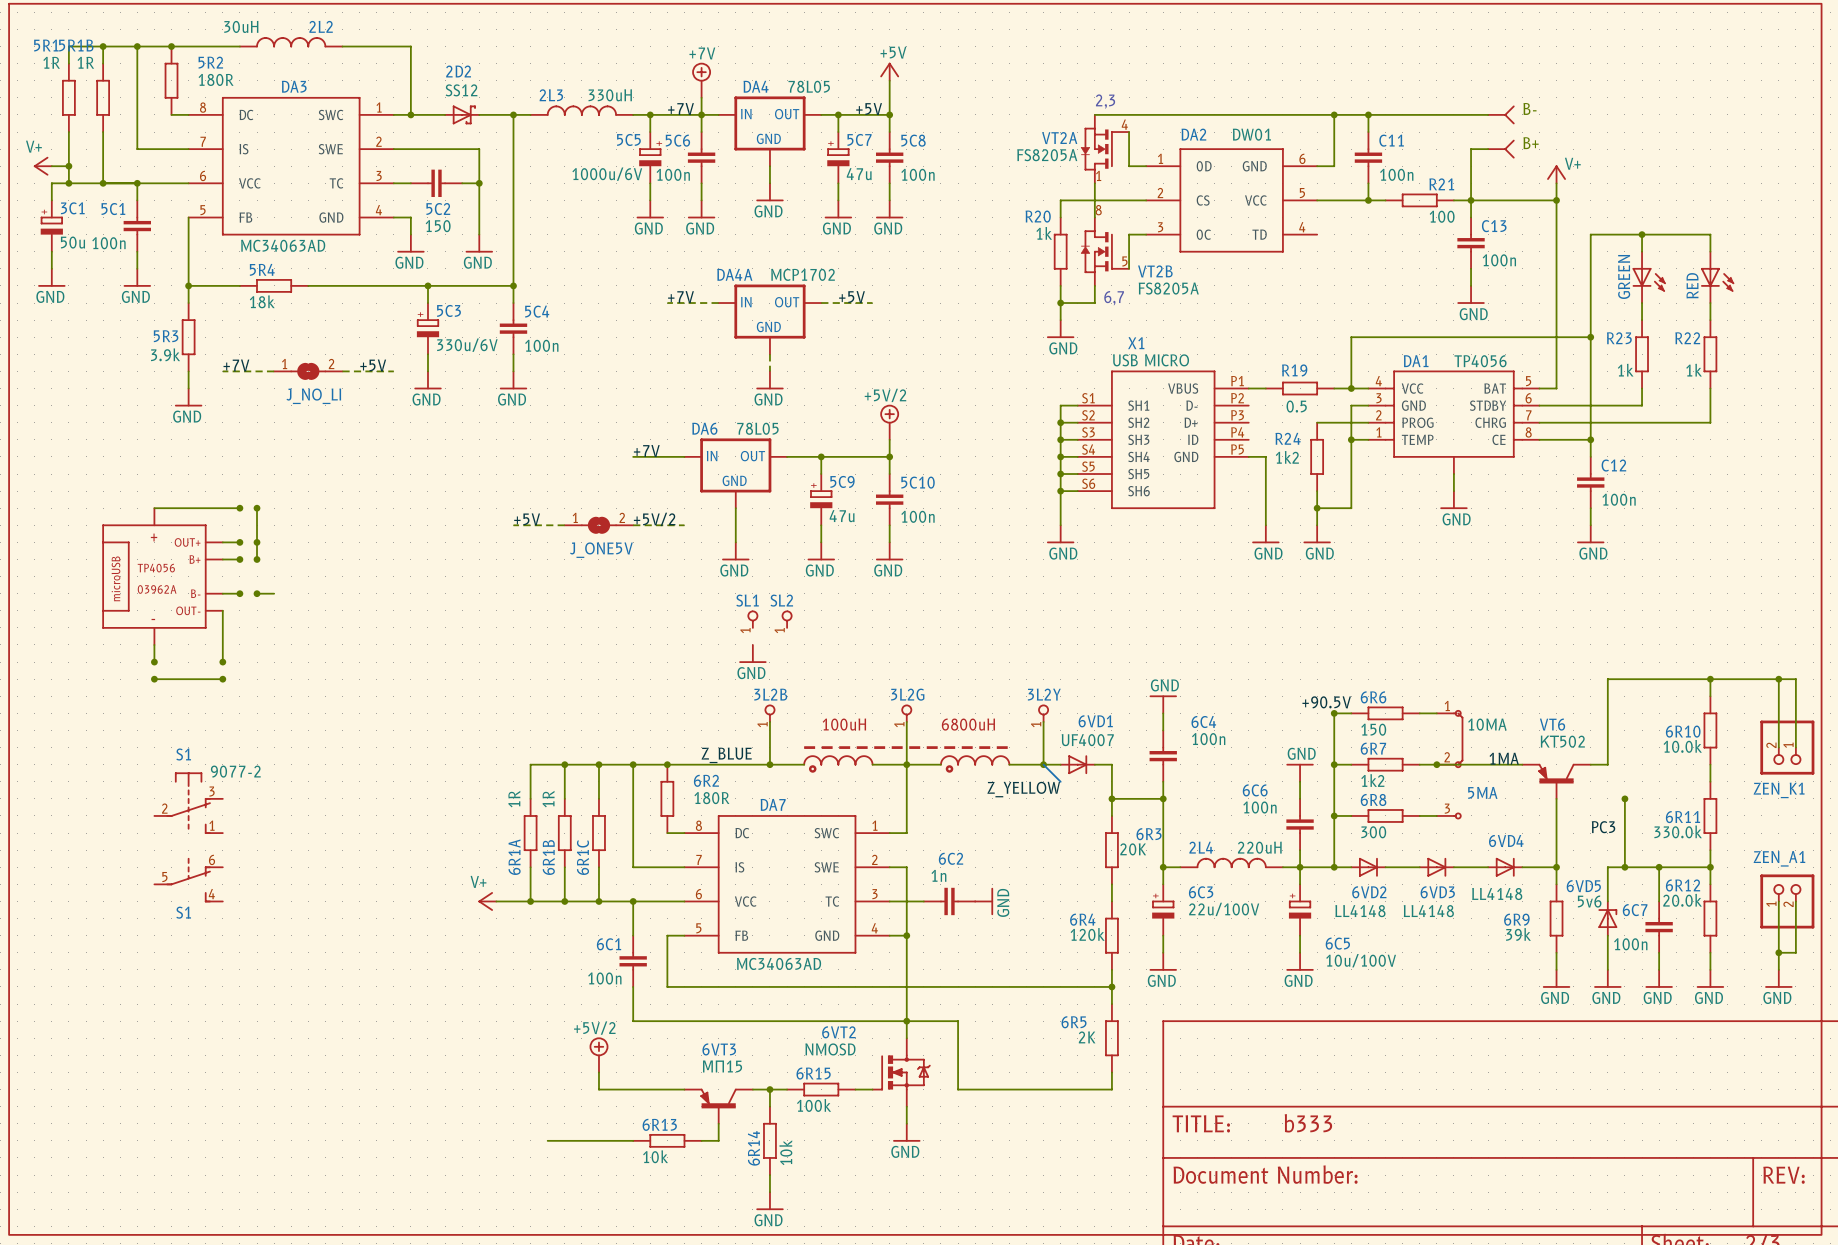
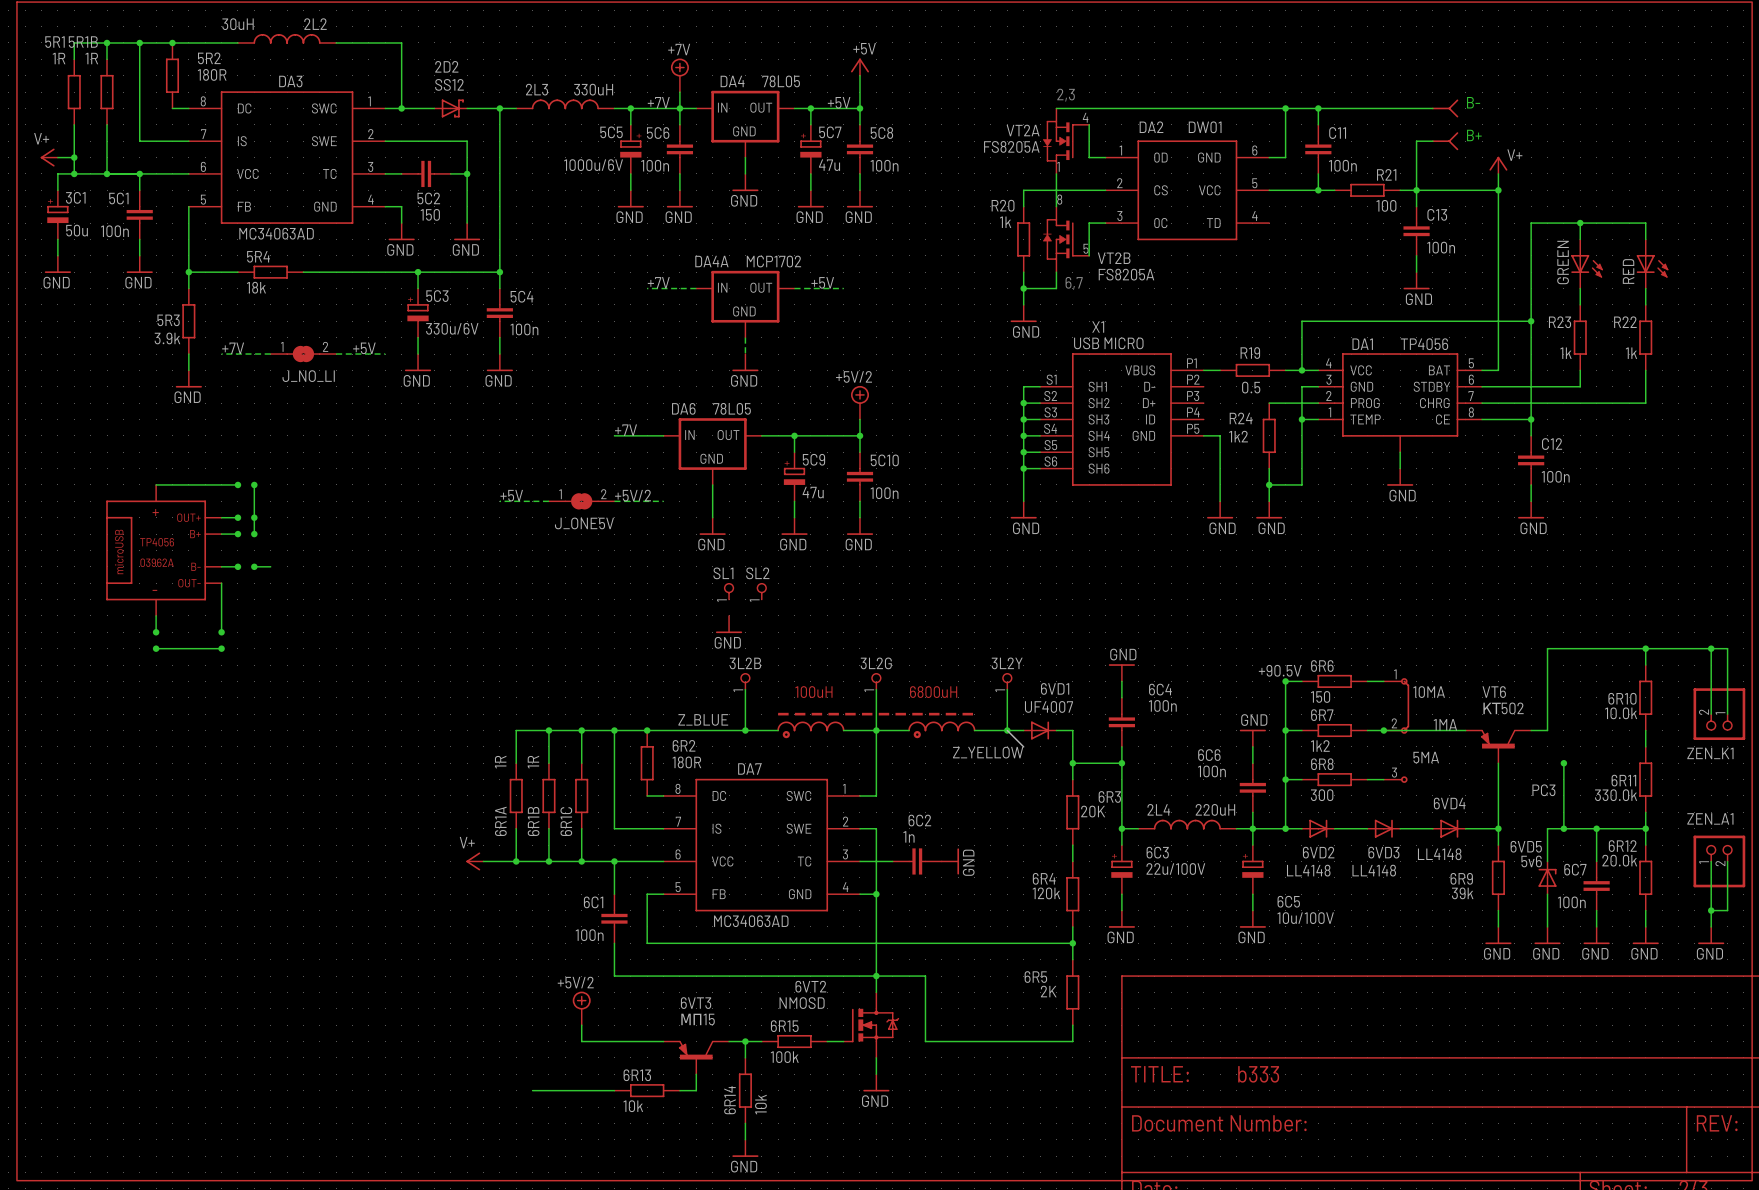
S1: 9077-2 (188, 803) -> none
S1: (188, 880) -> none

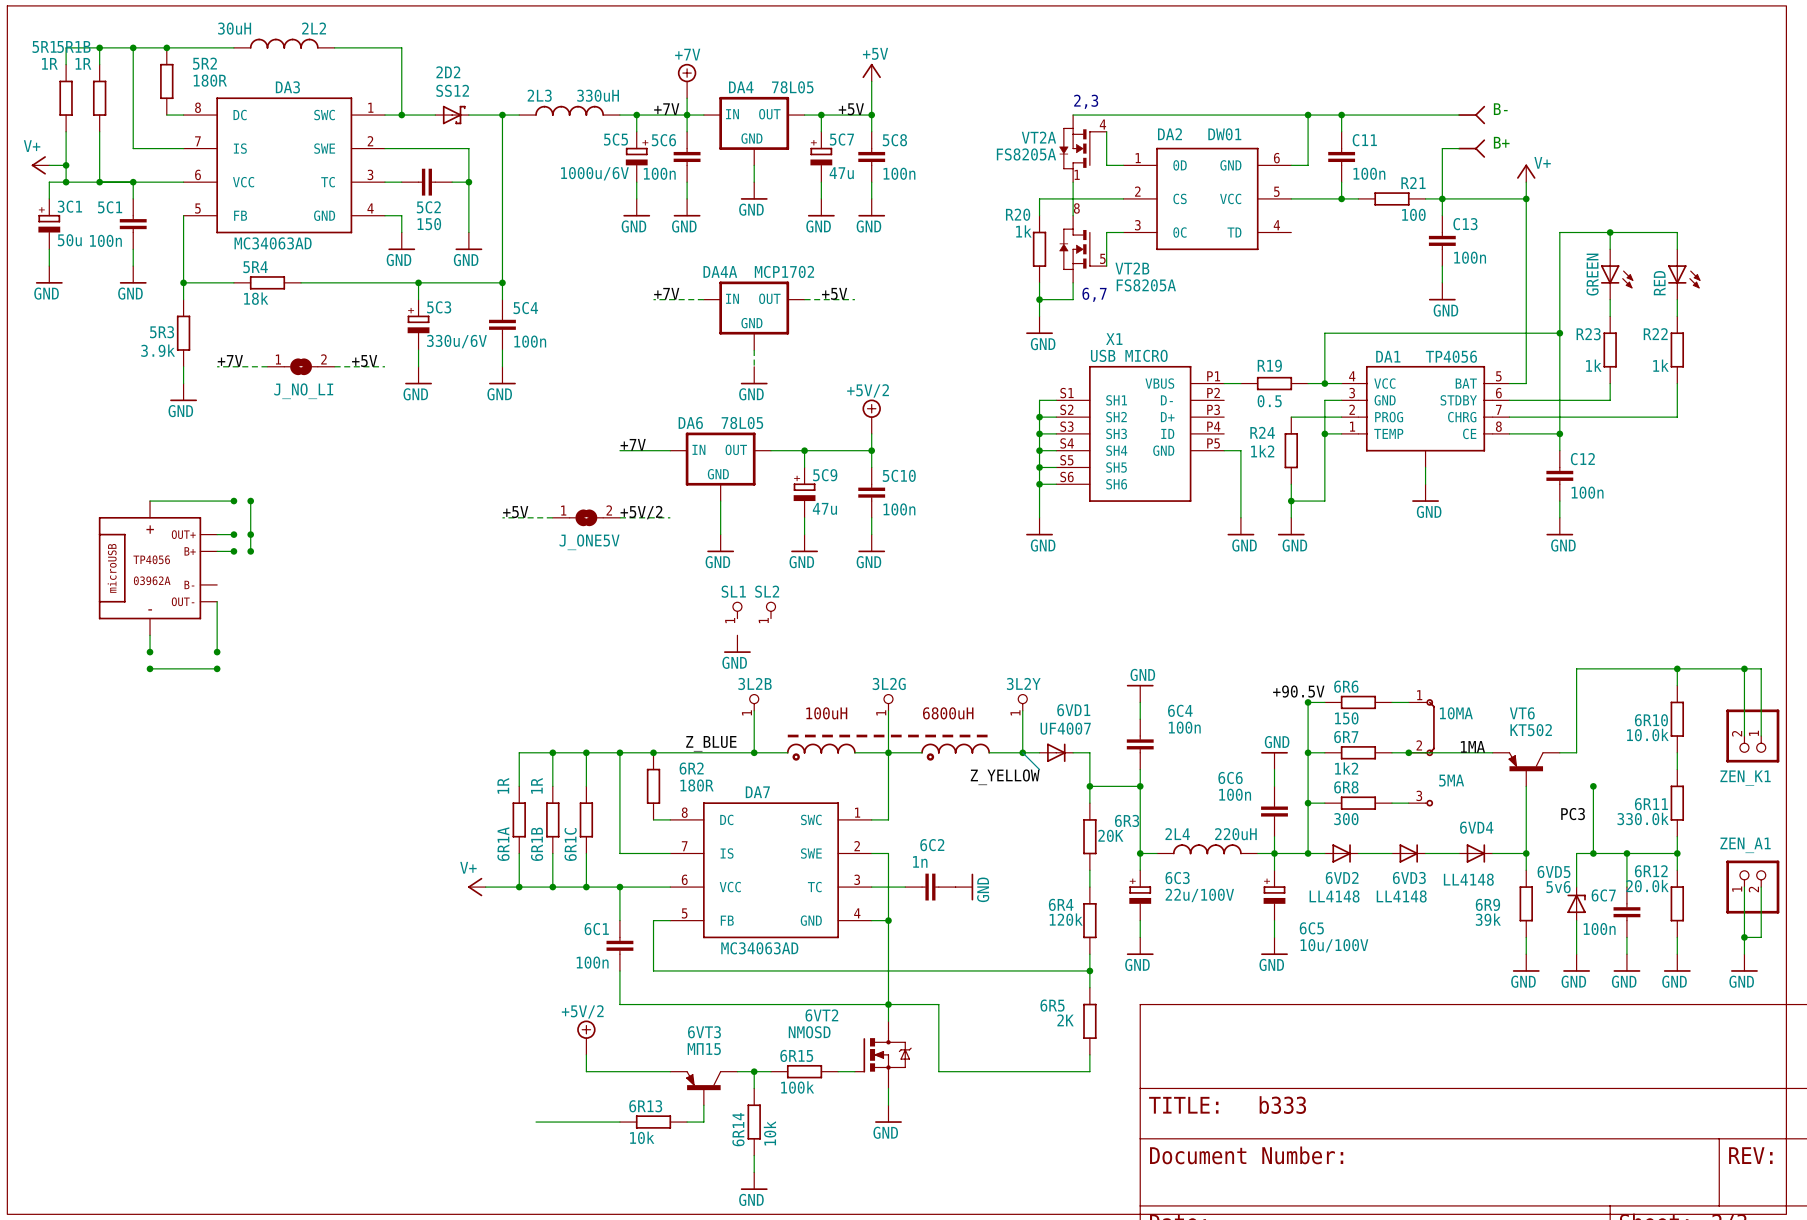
wire: (221, 566) (237, 566) -> none
junction: (237, 566) -> none
wire: (254, 566) (270, 566) -> none
junction: (254, 566) -> none

